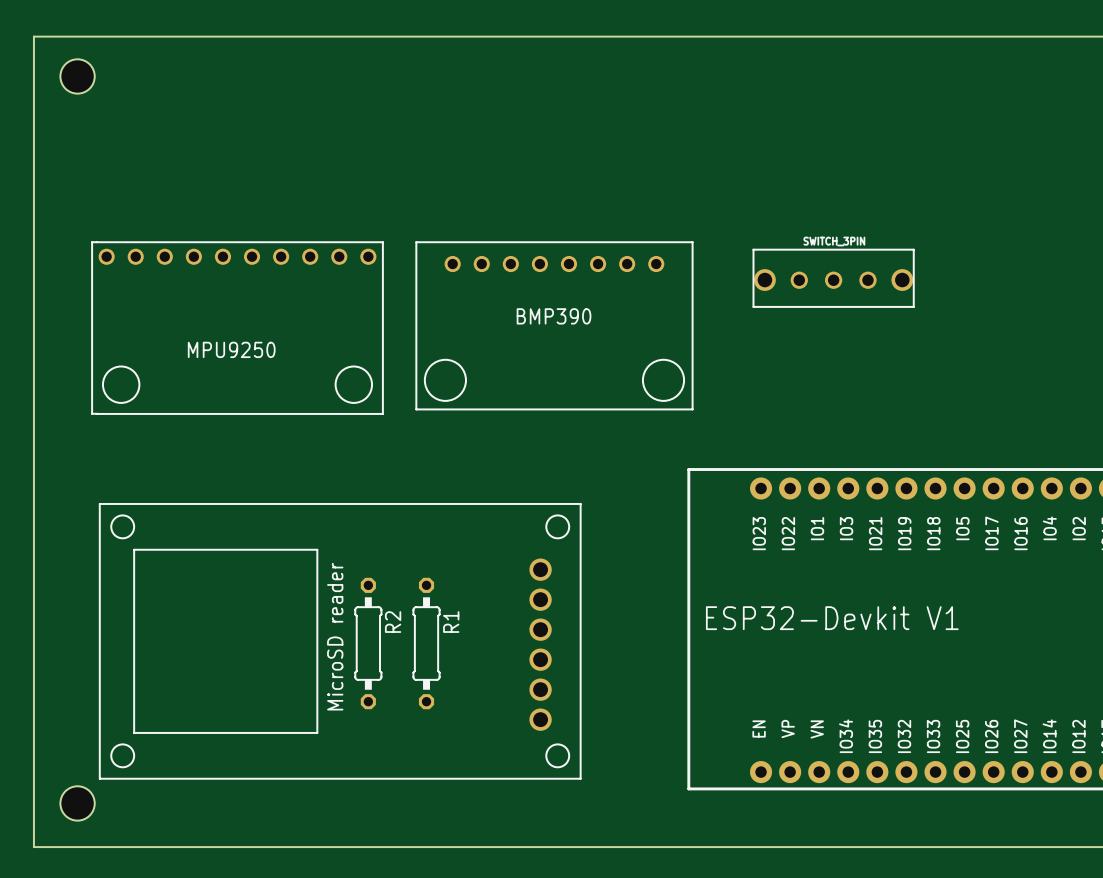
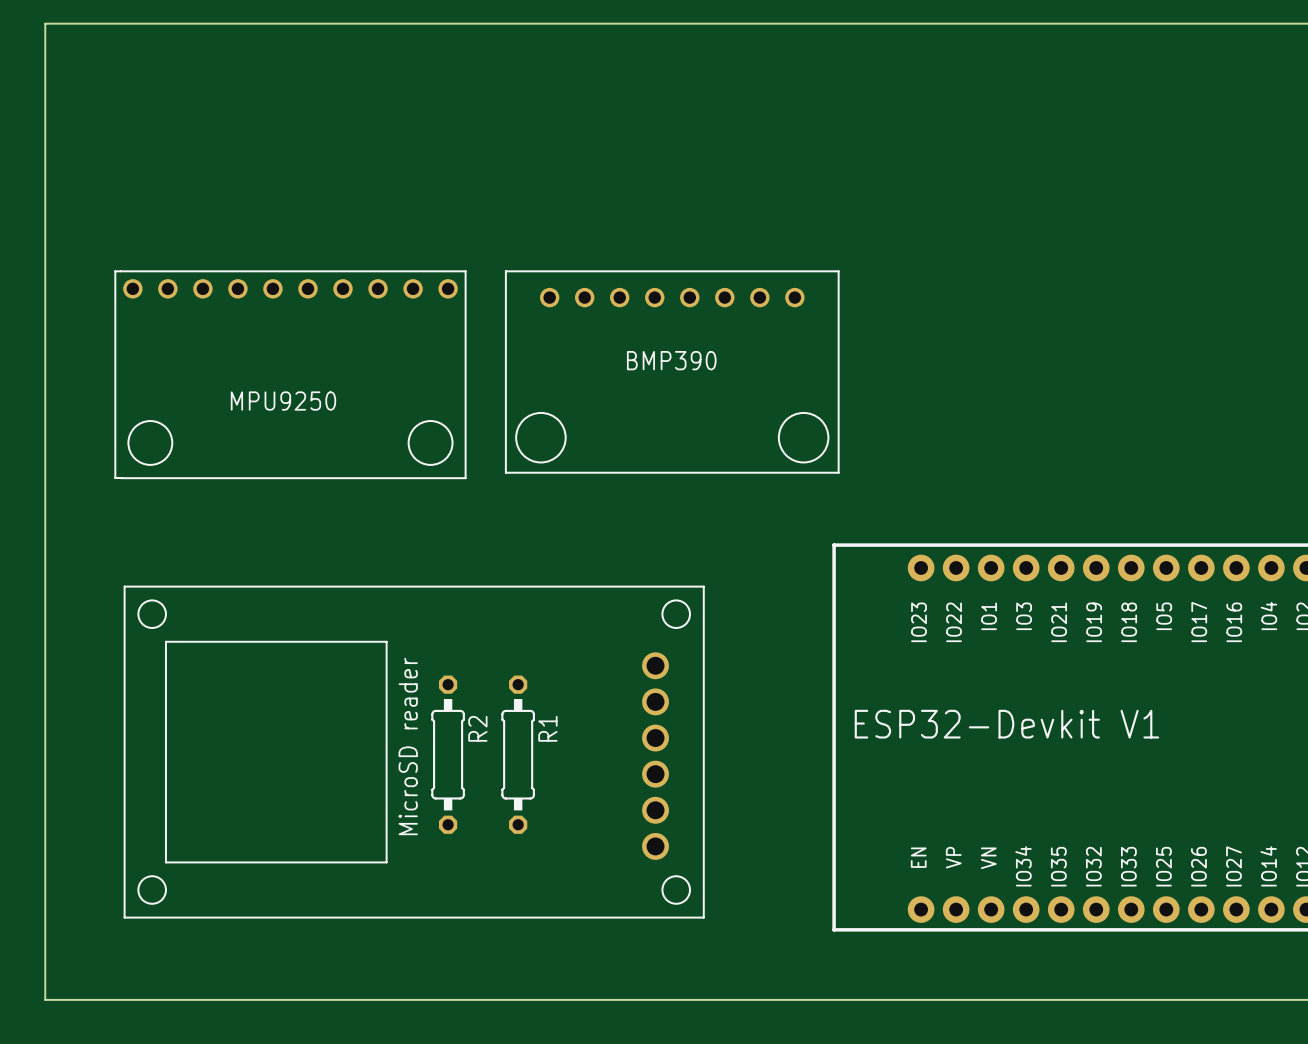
hole: (77, 76) -> none
part: (833, 278) -> none
hole: (77, 803) -> none

